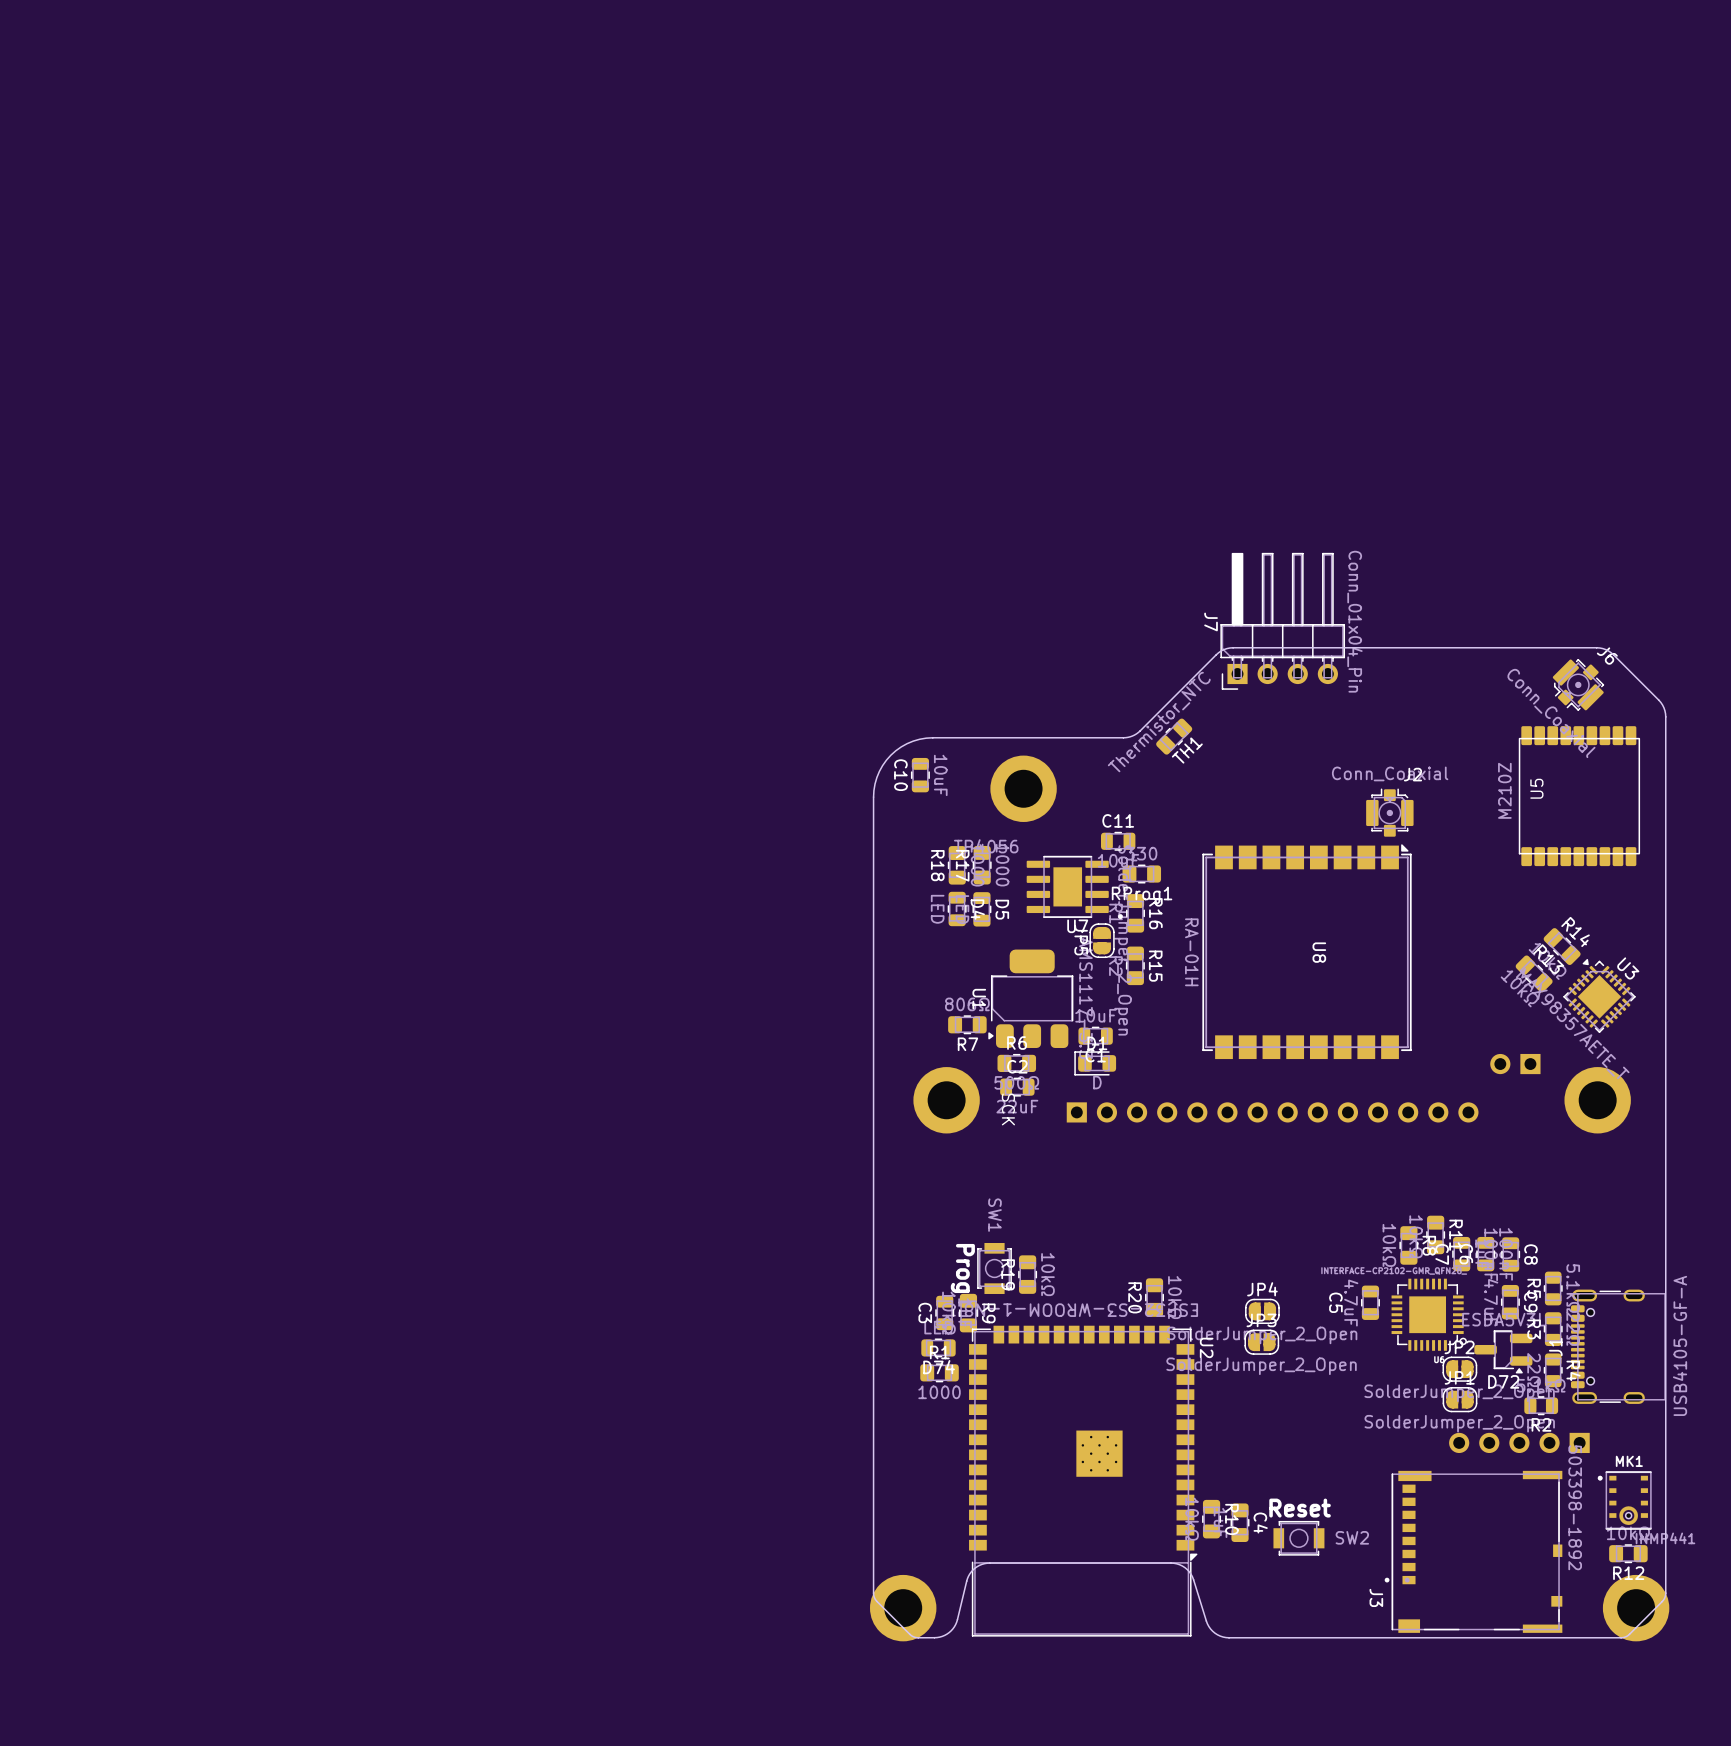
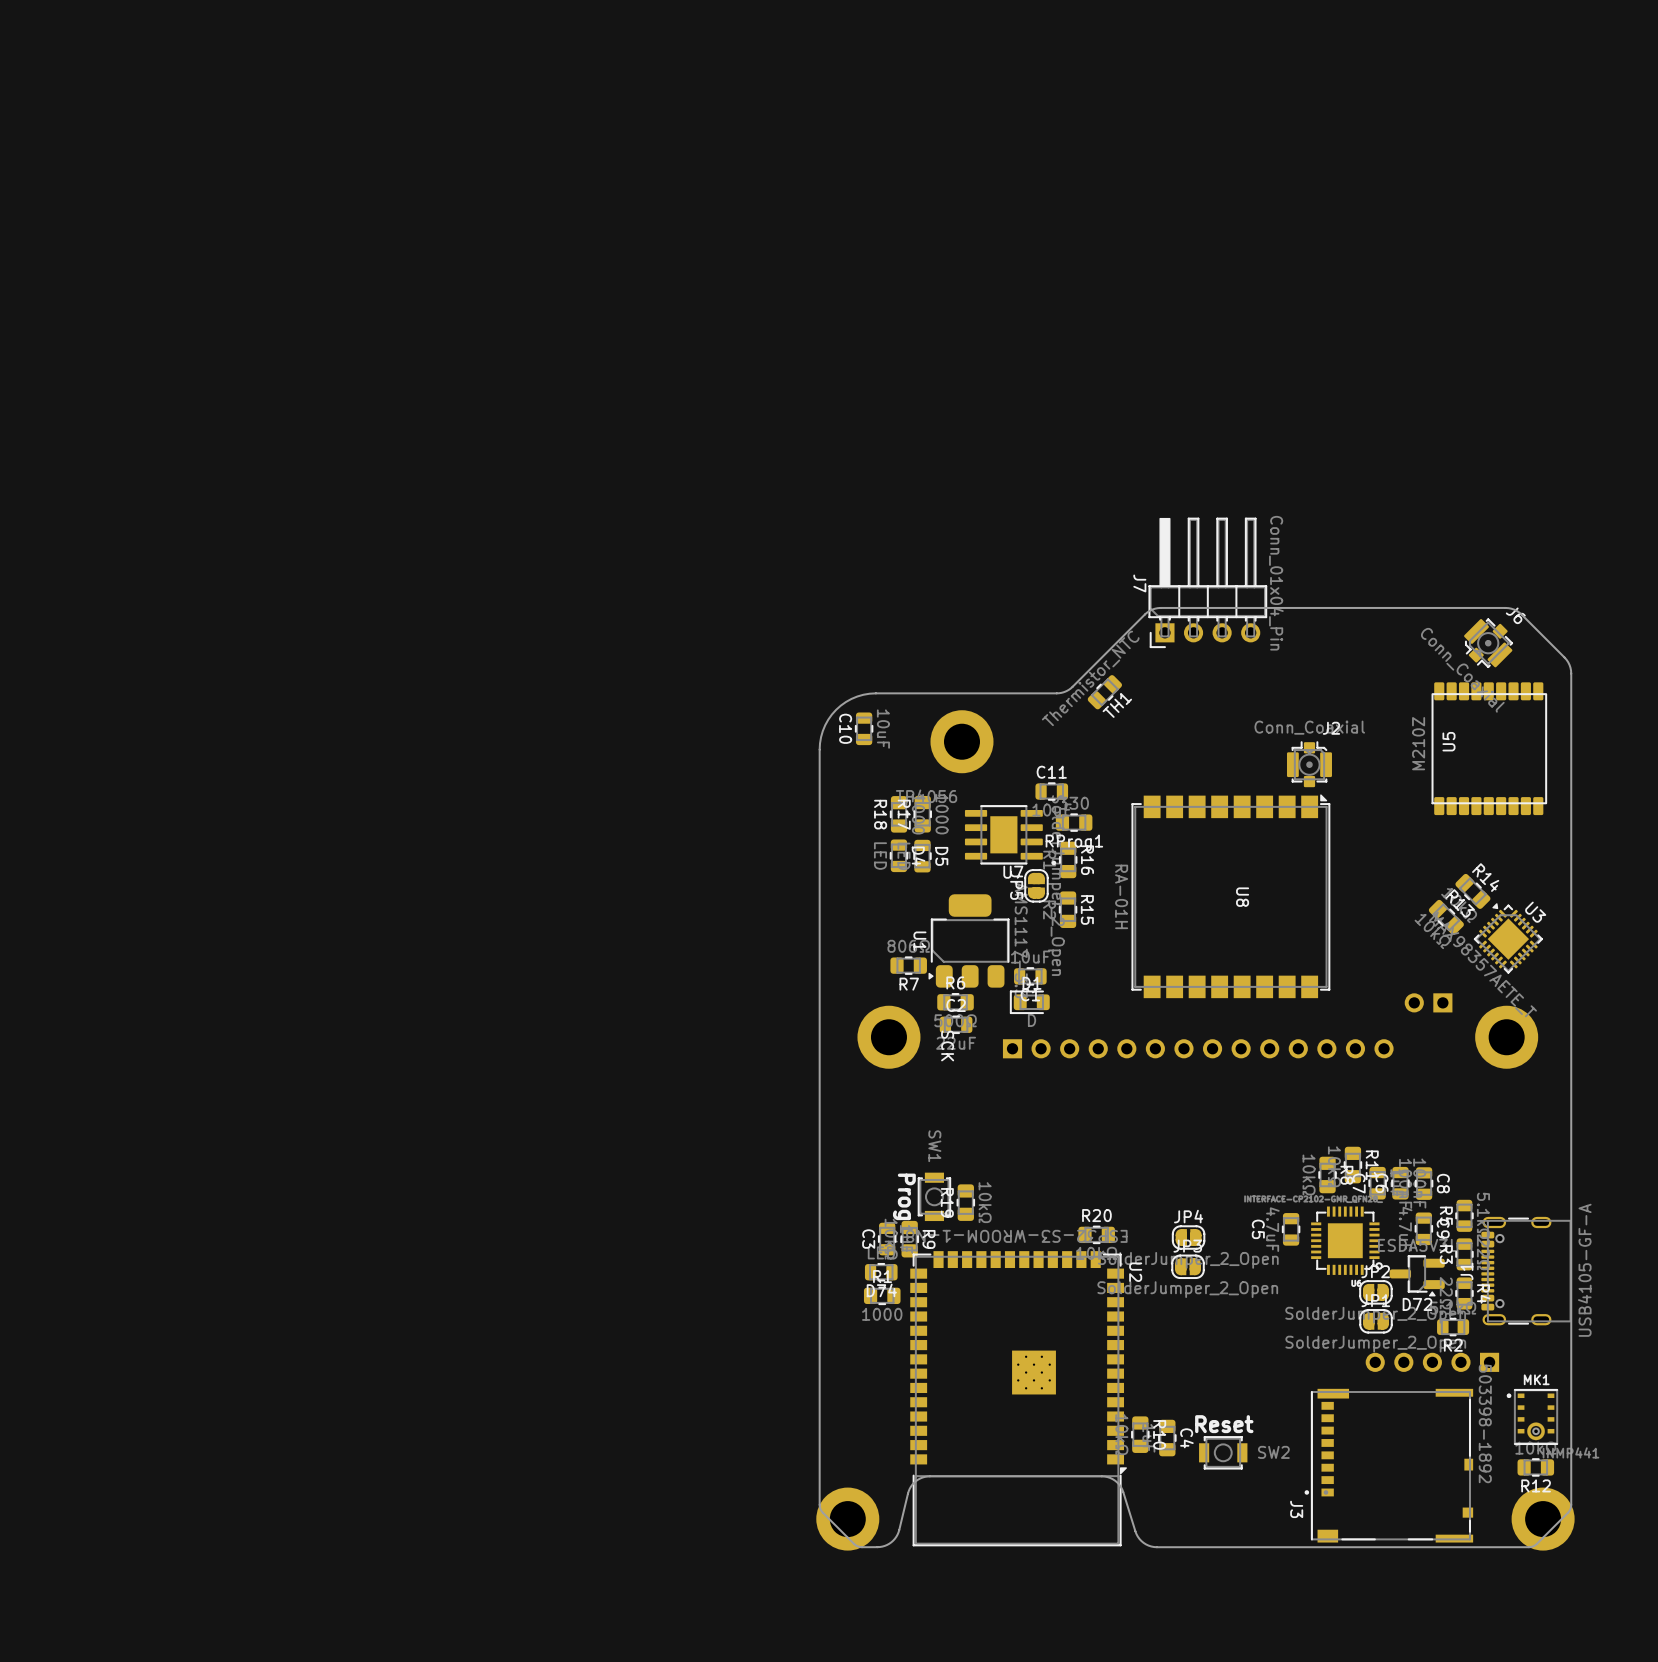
R20 rotation: 0° (1154, 1297) -> 90° clockwise (1096, 1234)

